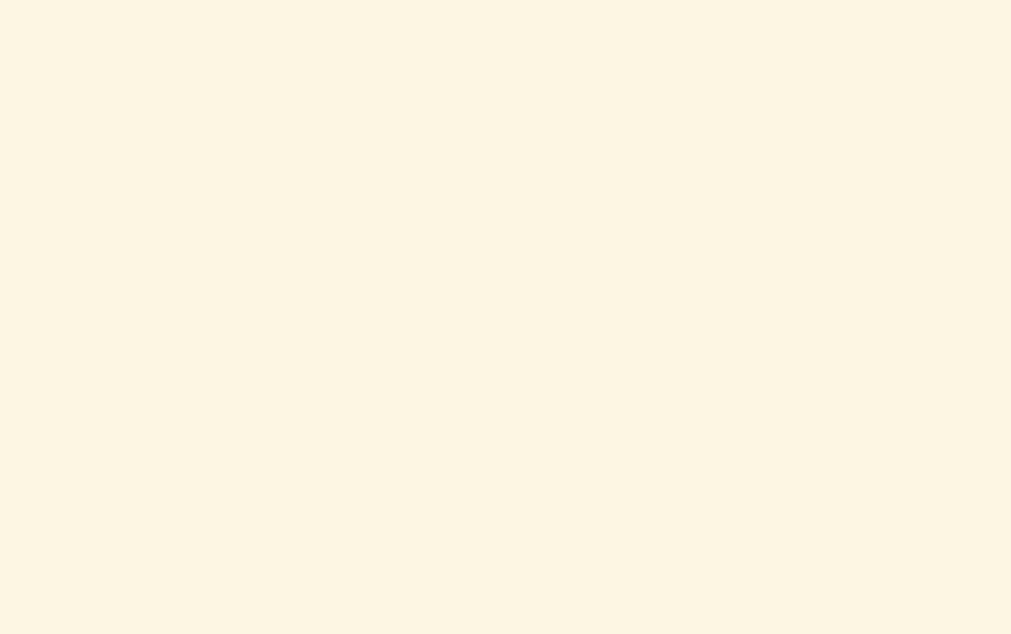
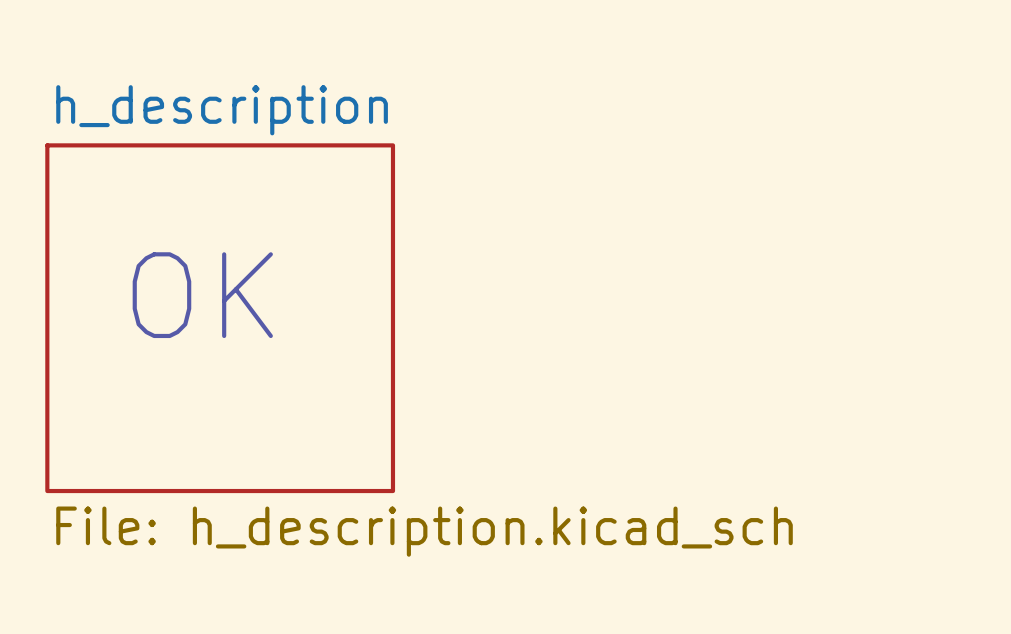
text: none -> OK (202, 295)
sheet h_description: none -> File: h_description.kicad_sch (220, 318)

